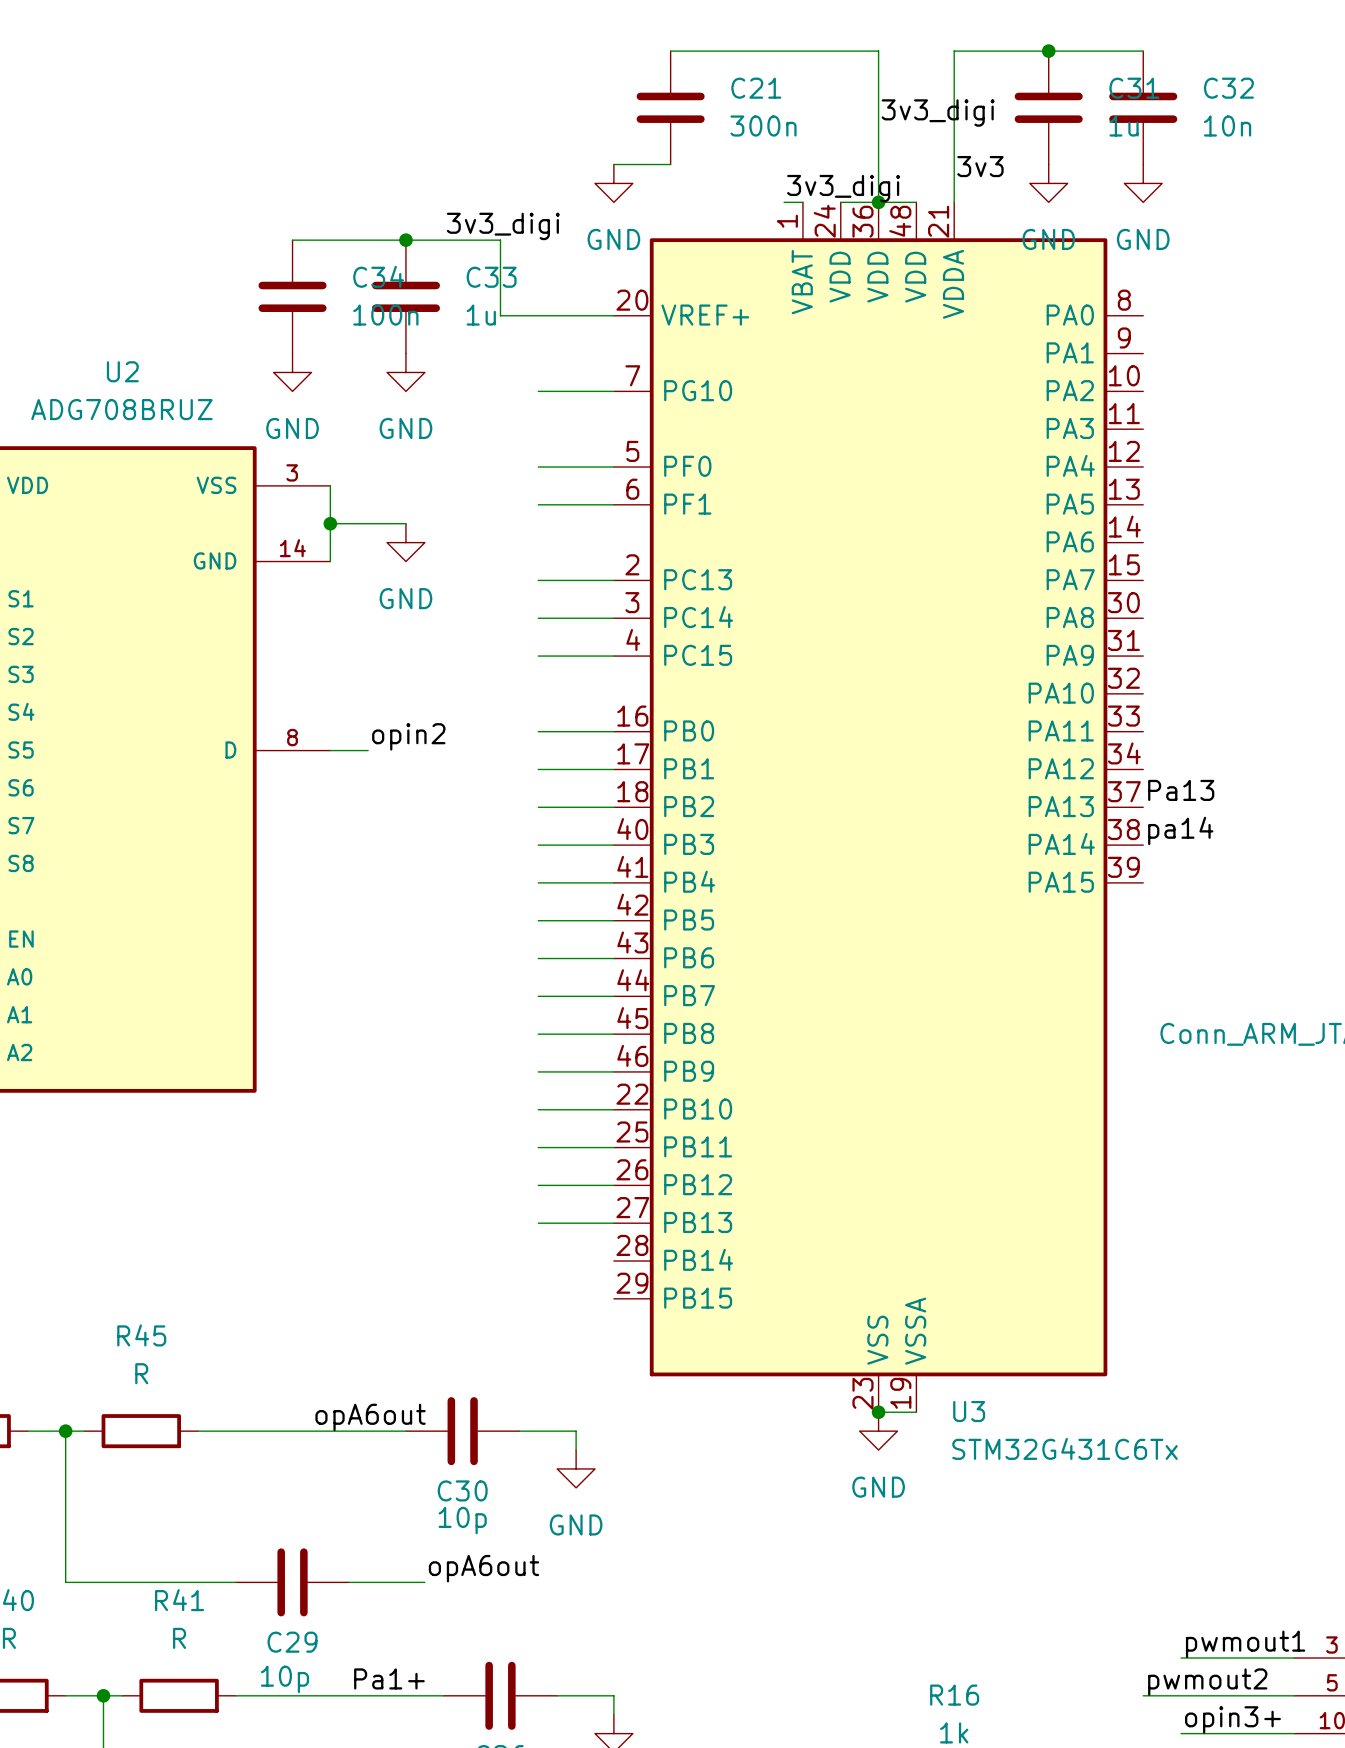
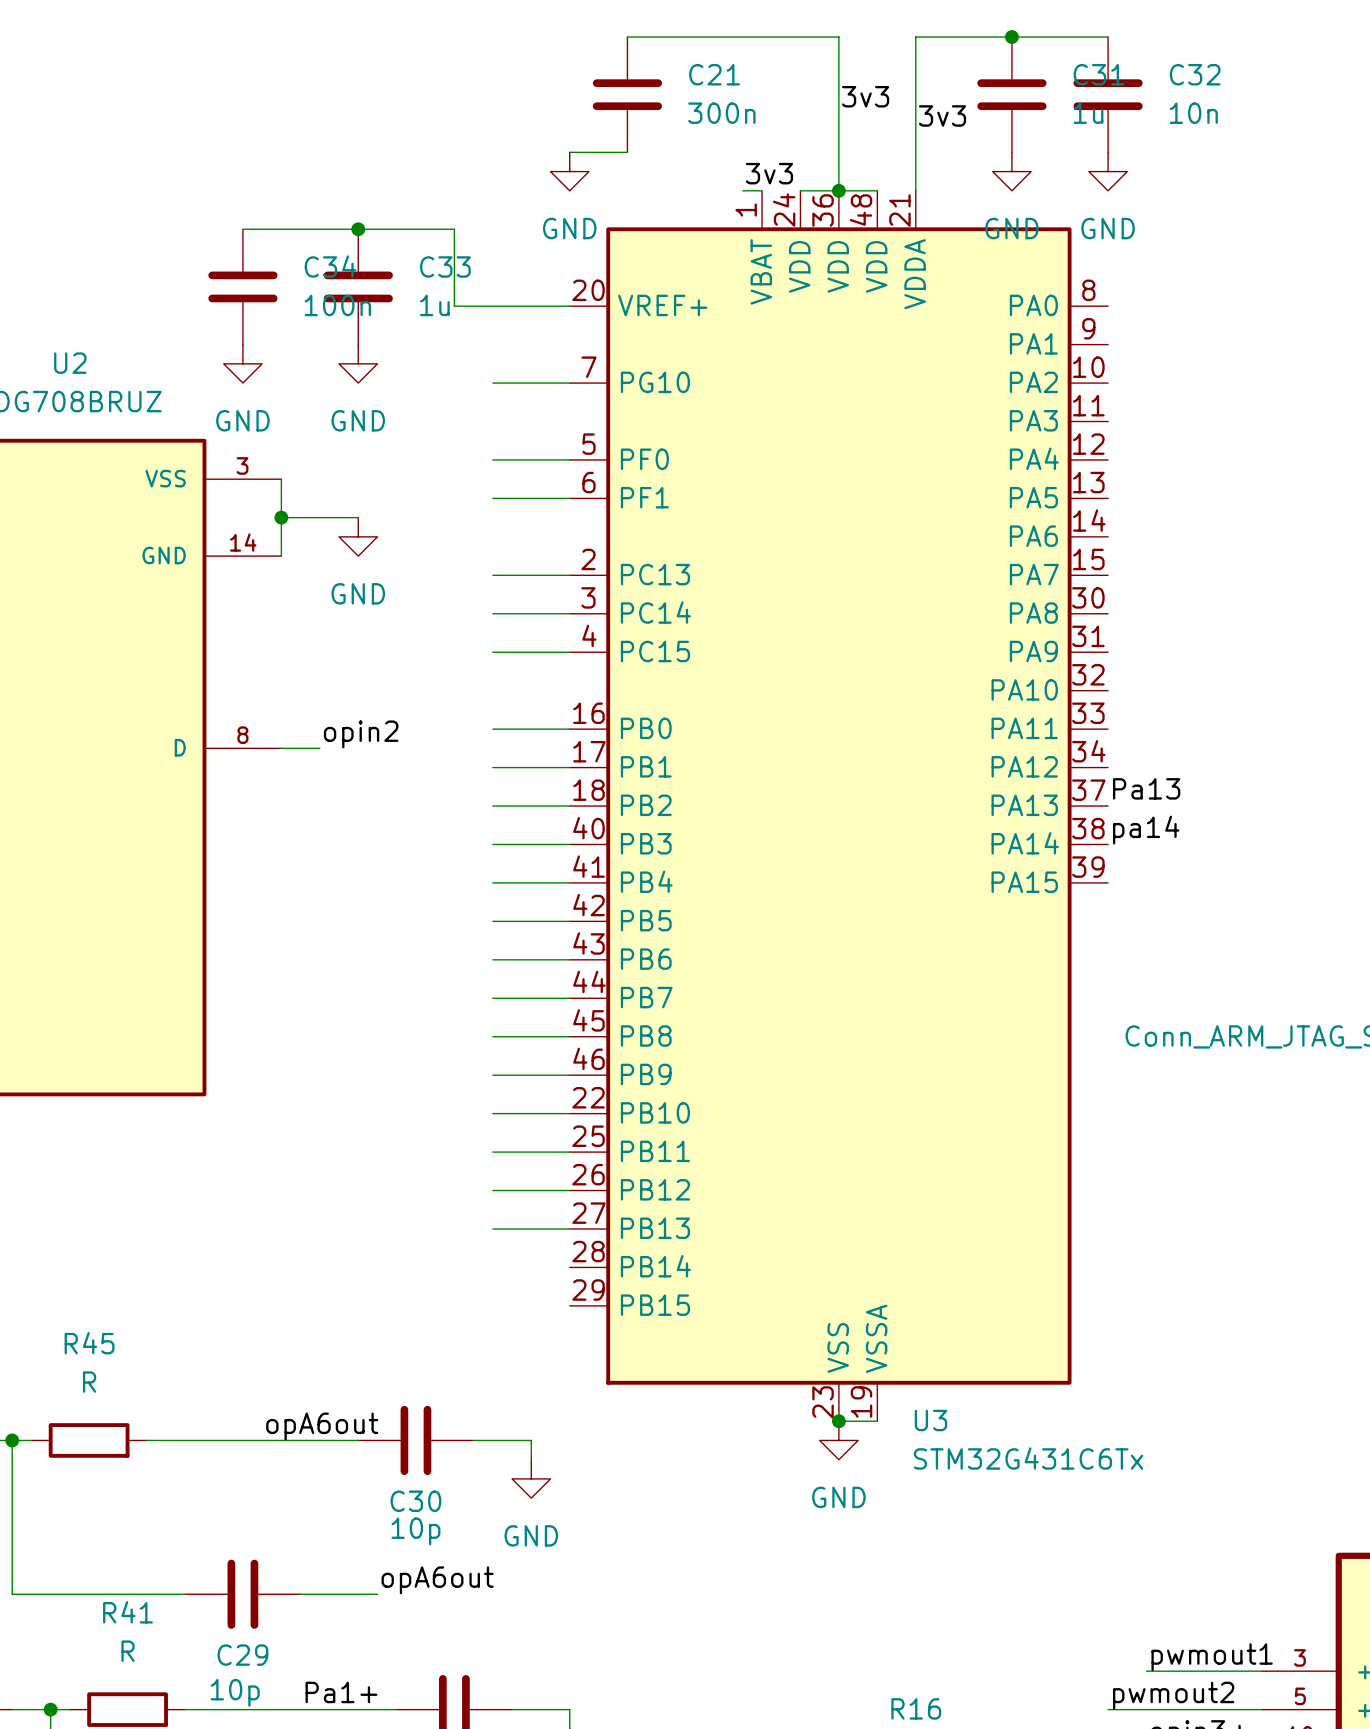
label: 3v3_digi (938, 113) -> 3v3 (865, 96)
label position: 3v3 (980, 166) -> 3v3 (942, 115)
label: 3v3_digi (843, 188) -> 3v3 (769, 173)
label: 3v3_digi (503, 226) -> none

